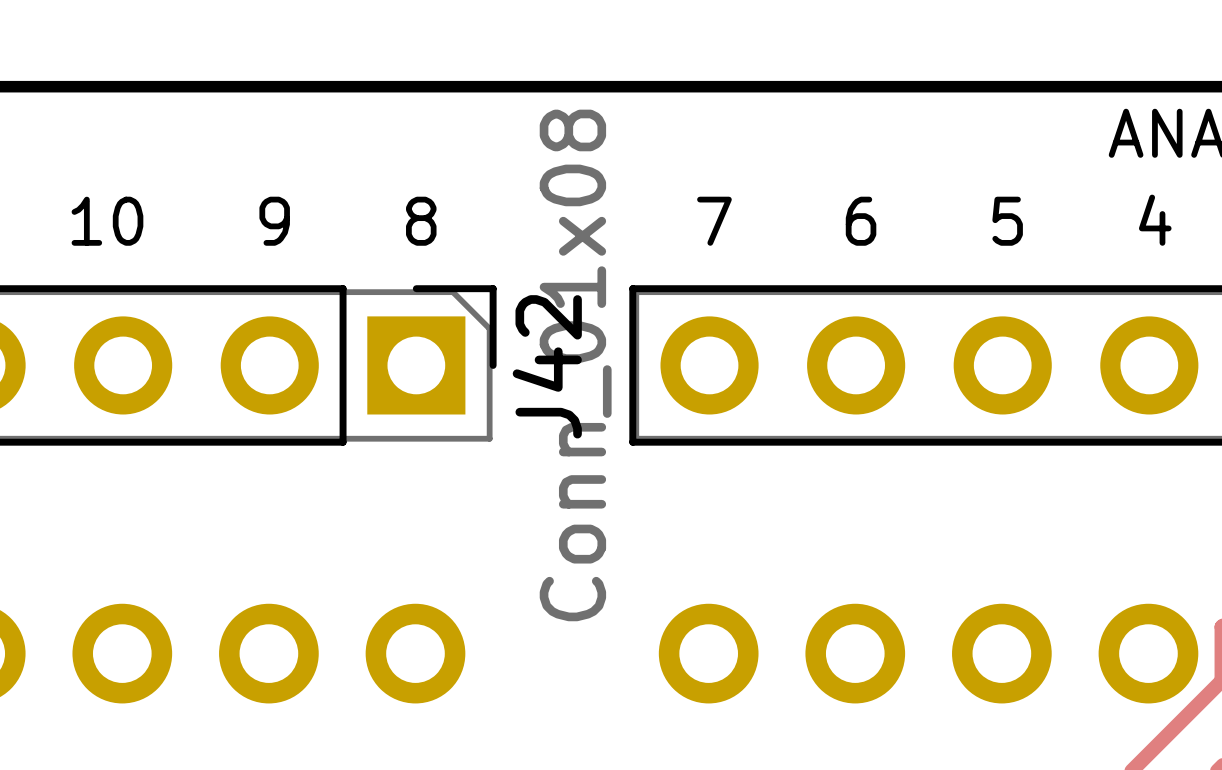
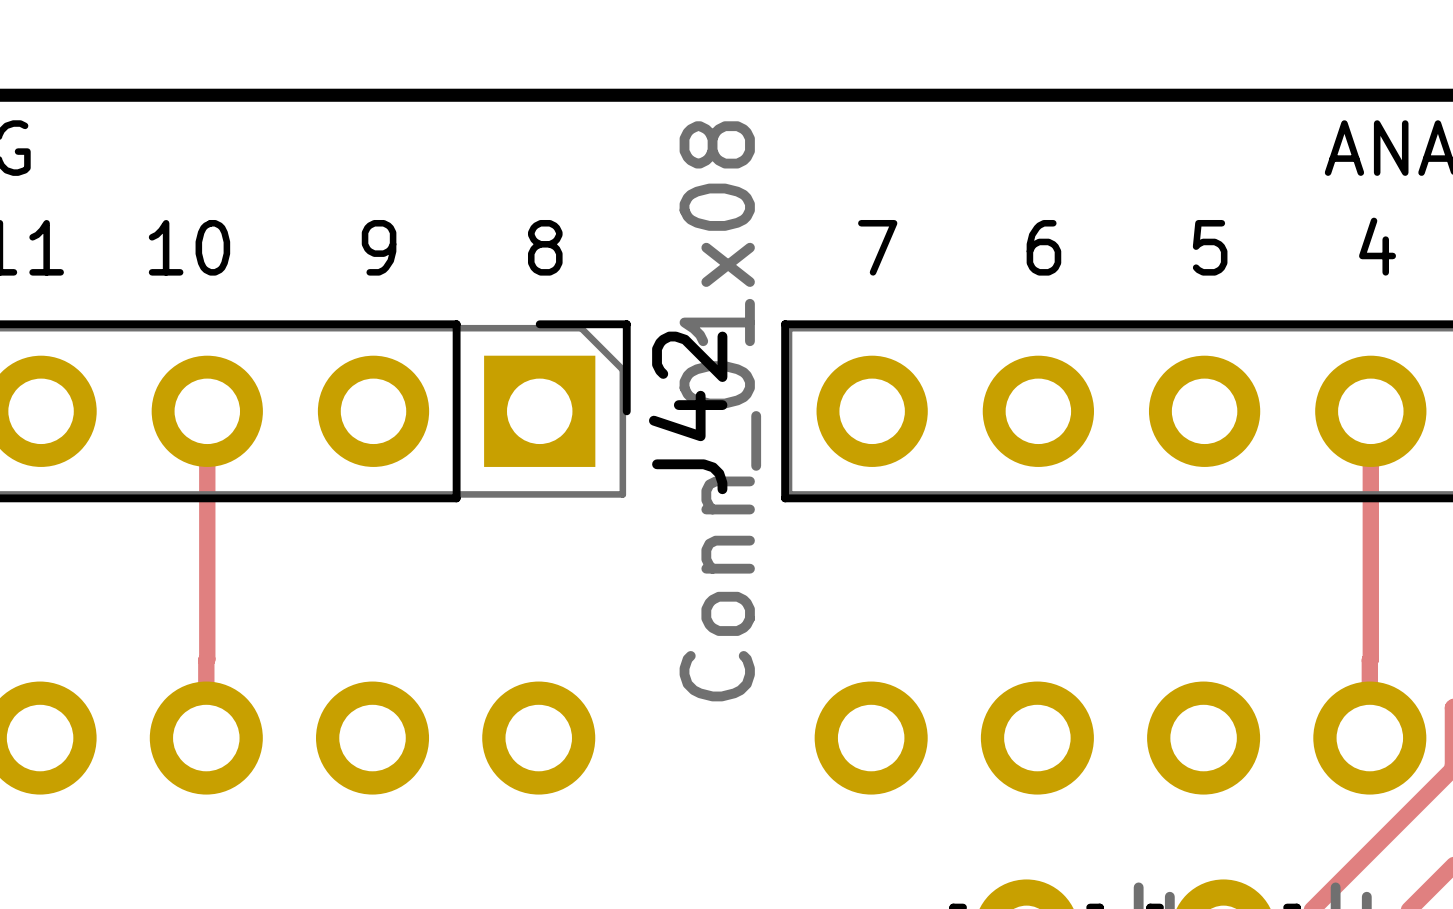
track: none -> (207, 411) (206, 738)
track: none -> (1370, 411) (1369, 738)

